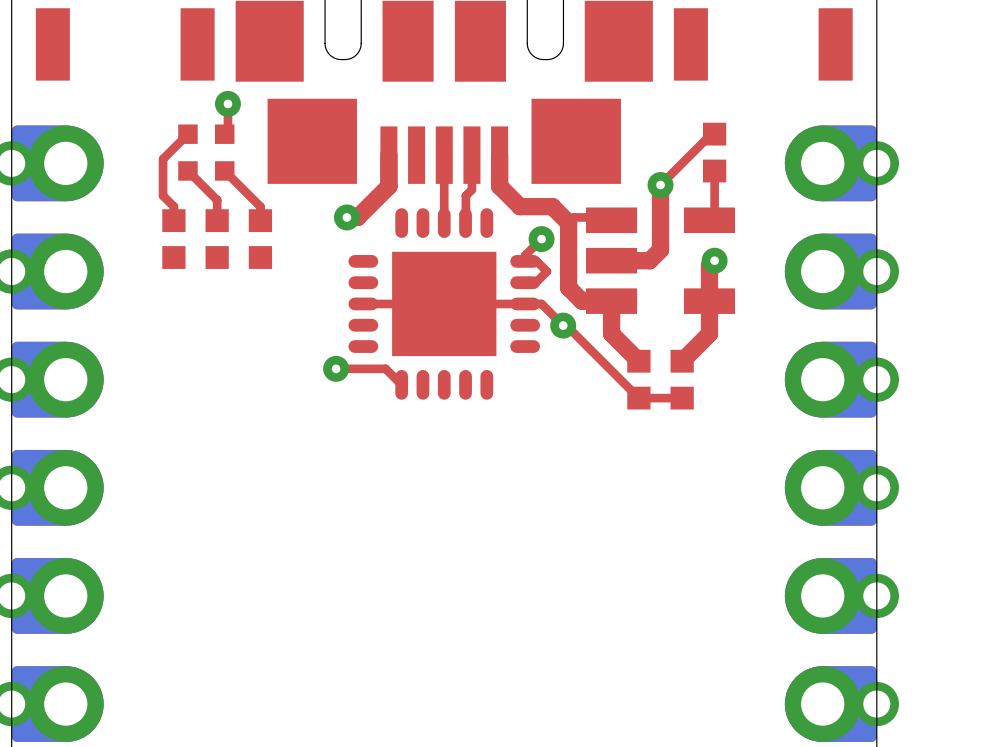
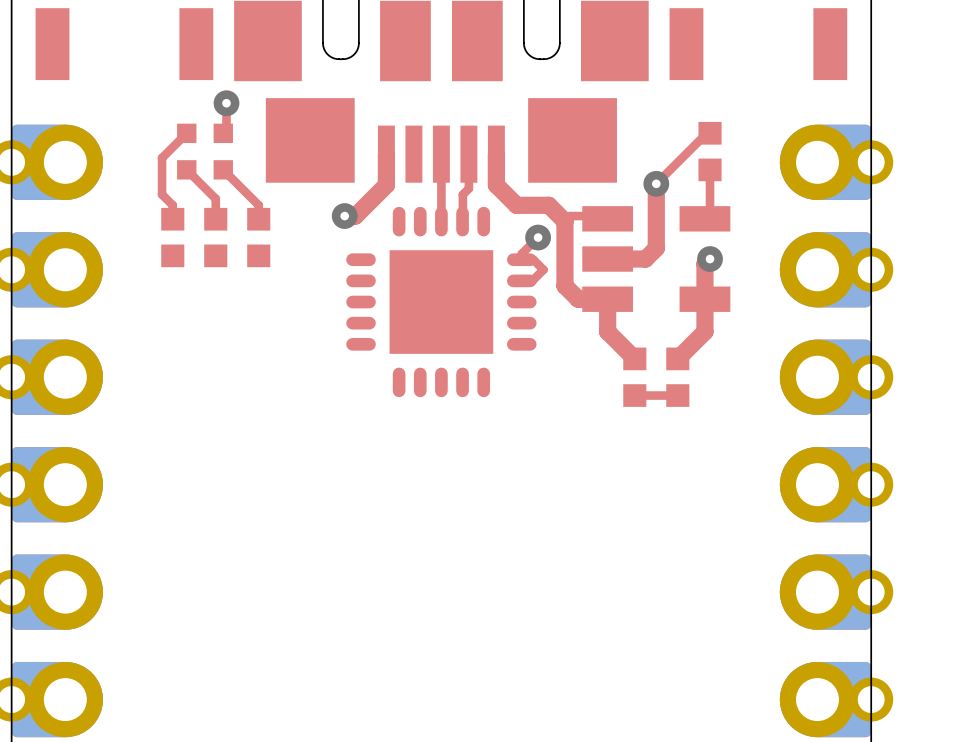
top track: (363, 303) (541, 303) (563, 325) (566, 325) (638, 398) -> none
via: (563, 325) -> none
top track: (336, 368) (385, 368) (401, 384) -> none
via: (336, 368) -> none

